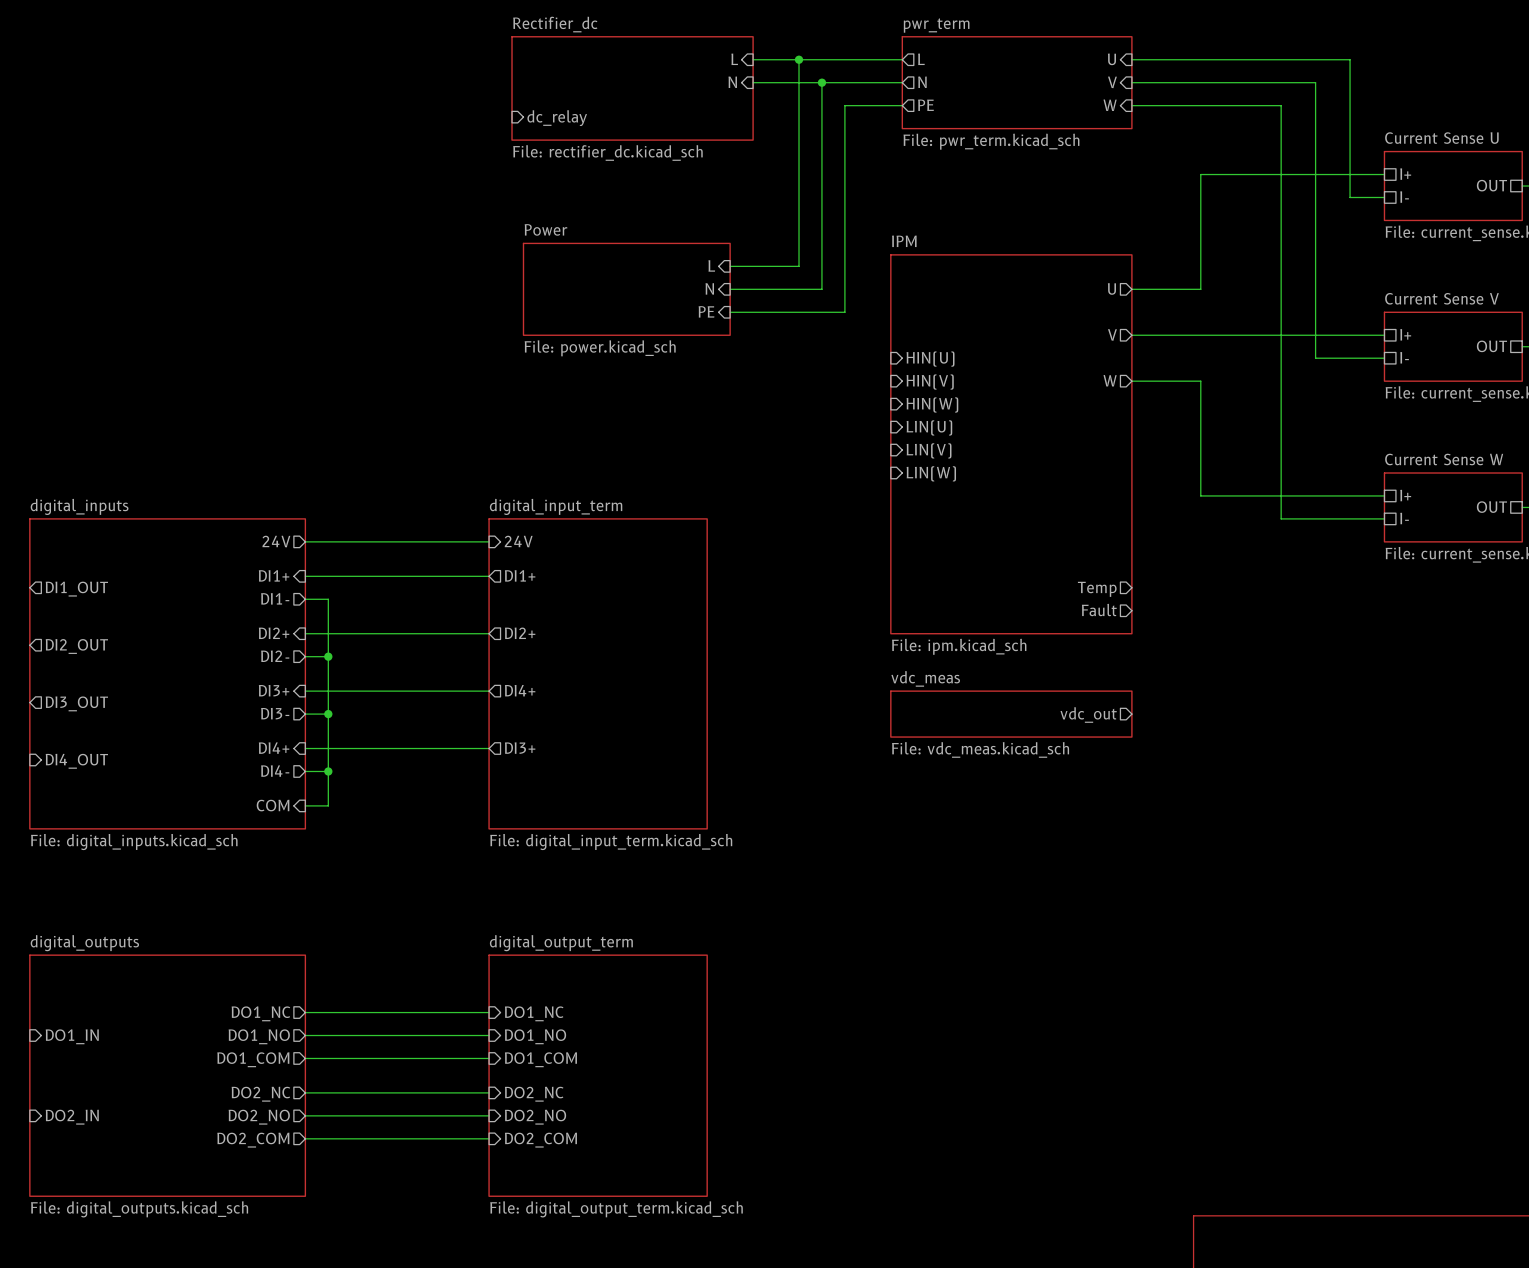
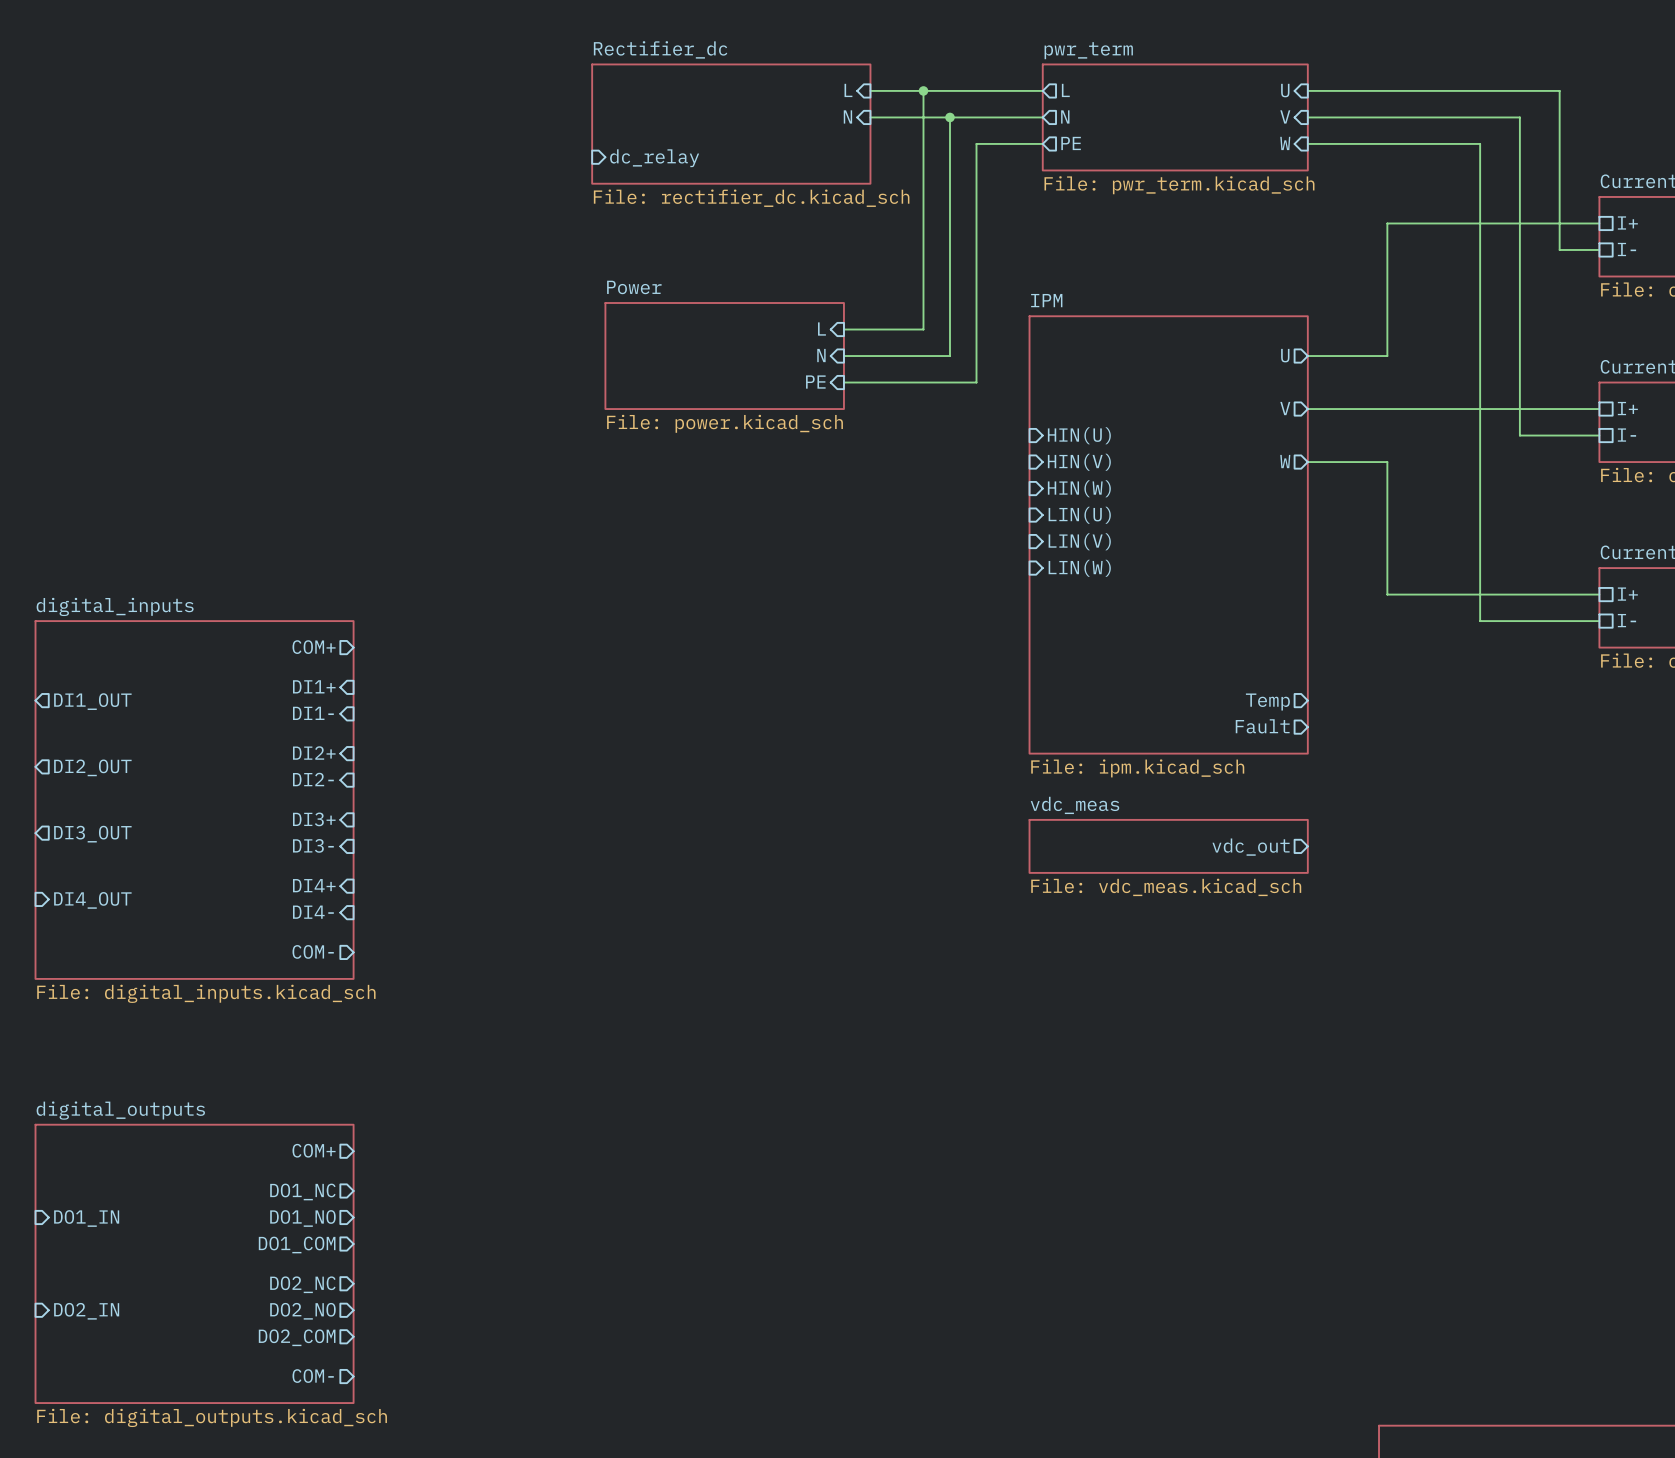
sheet pin: 24V (276, 541) -> COM+ (314, 647)
wire: (305, 541) (489, 541) -> none
sheet pin: 24V (518, 541) -> none
sheet pin: DI1+ (520, 575) -> none
wire: (305, 576) (489, 576) -> none
sheet pin shape: output (275, 598) -> input (313, 713)
wire: (305, 599) (328, 599) (328, 805) (305, 805) -> none
wire: (305, 633) (489, 633) -> none
sheet pin: DI2+ (520, 633) -> none
sheet pin shape: output (275, 656) -> input (313, 779)
wire: (305, 656) (328, 656) -> none
junction: (328, 656) -> none
sheet digital_input_term: File: digital_input_term.kicad_sch (598, 673) -> none
sheet pin: DI4+ (520, 690) -> none
wire: (305, 691) (489, 691) -> none
sheet pin shape: output (275, 713) -> input (313, 845)
wire: (305, 714) (328, 714) -> none
junction: (328, 714) -> none
wire: (305, 748) (489, 748) -> none
sheet pin: DI3+ (520, 748) -> none
sheet pin shape: output (275, 771) -> input (313, 912)
wire: (305, 771) (328, 771) -> none
junction: (328, 771) -> none
sheet pin shape: input (273, 805) -> output (313, 951)
sheet pin: COM (273, 805) -> COM- (313, 951)
sheet pin: none -> COM+ (314, 1150)
wire: (305, 1012) (489, 1012) -> none
sheet pin: DO1_NC (534, 1013) -> none
wire: (305, 1035) (489, 1035) -> none
sheet pin: DO1_NO (535, 1036) -> none
wire: (305, 1058) (489, 1058) -> none
sheet pin: DO1_COM (540, 1059) -> none
sheet digital_output_term: File: digital_output_term.kicad_sch (598, 1075) -> none
wire: (305, 1092) (489, 1092) -> none
sheet pin: DO2_NC (534, 1094) -> none
wire: (305, 1115) (489, 1115) -> none
sheet pin: DO2_NO (535, 1117) -> none
wire: (305, 1138) (489, 1138) -> none
sheet pin: DO2_COM (540, 1140) -> none
sheet pin: none -> COM- (313, 1376)

